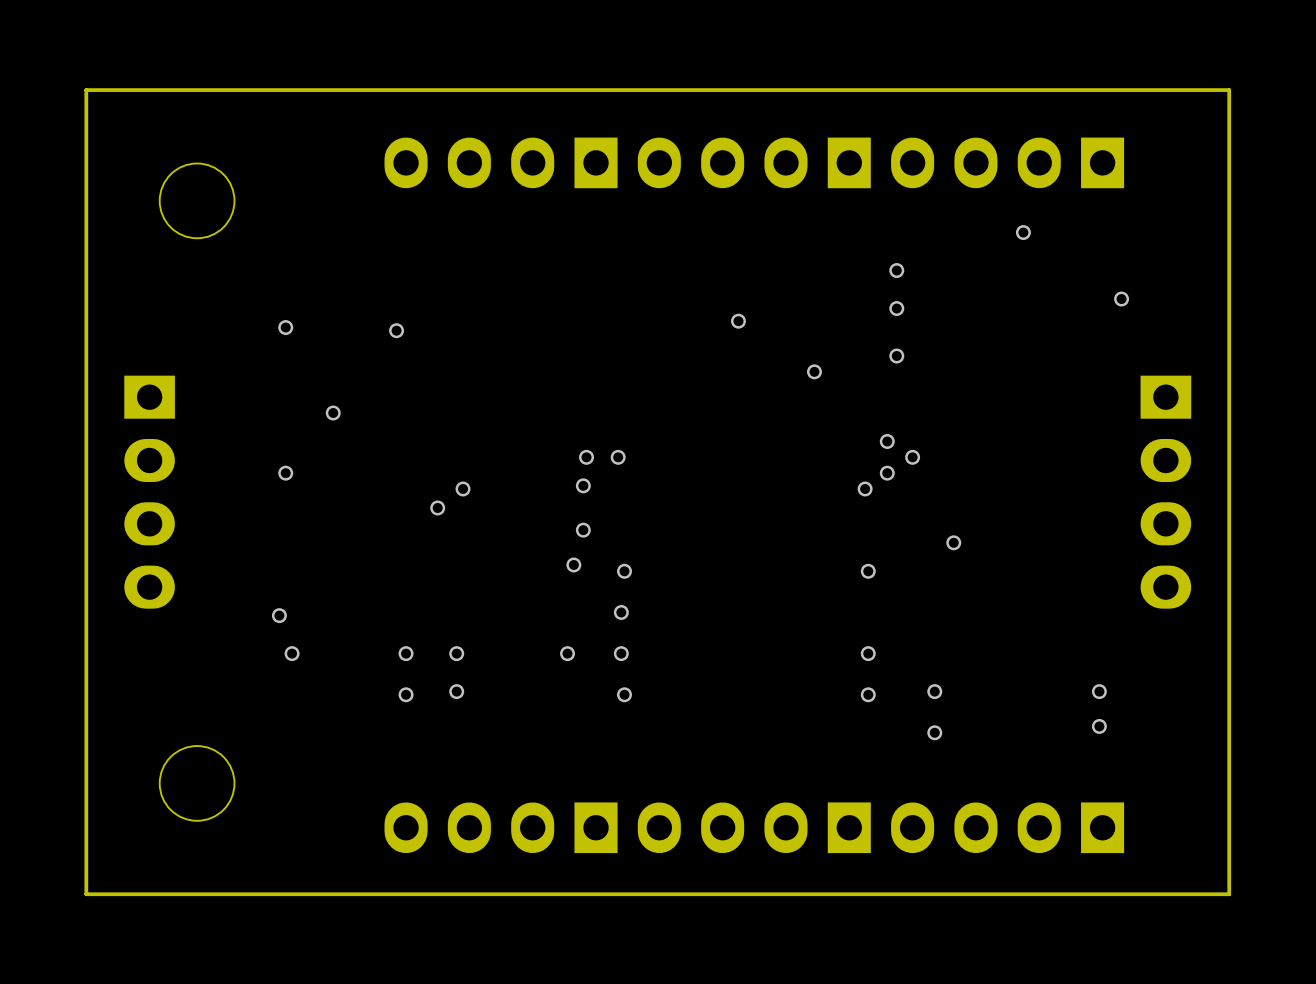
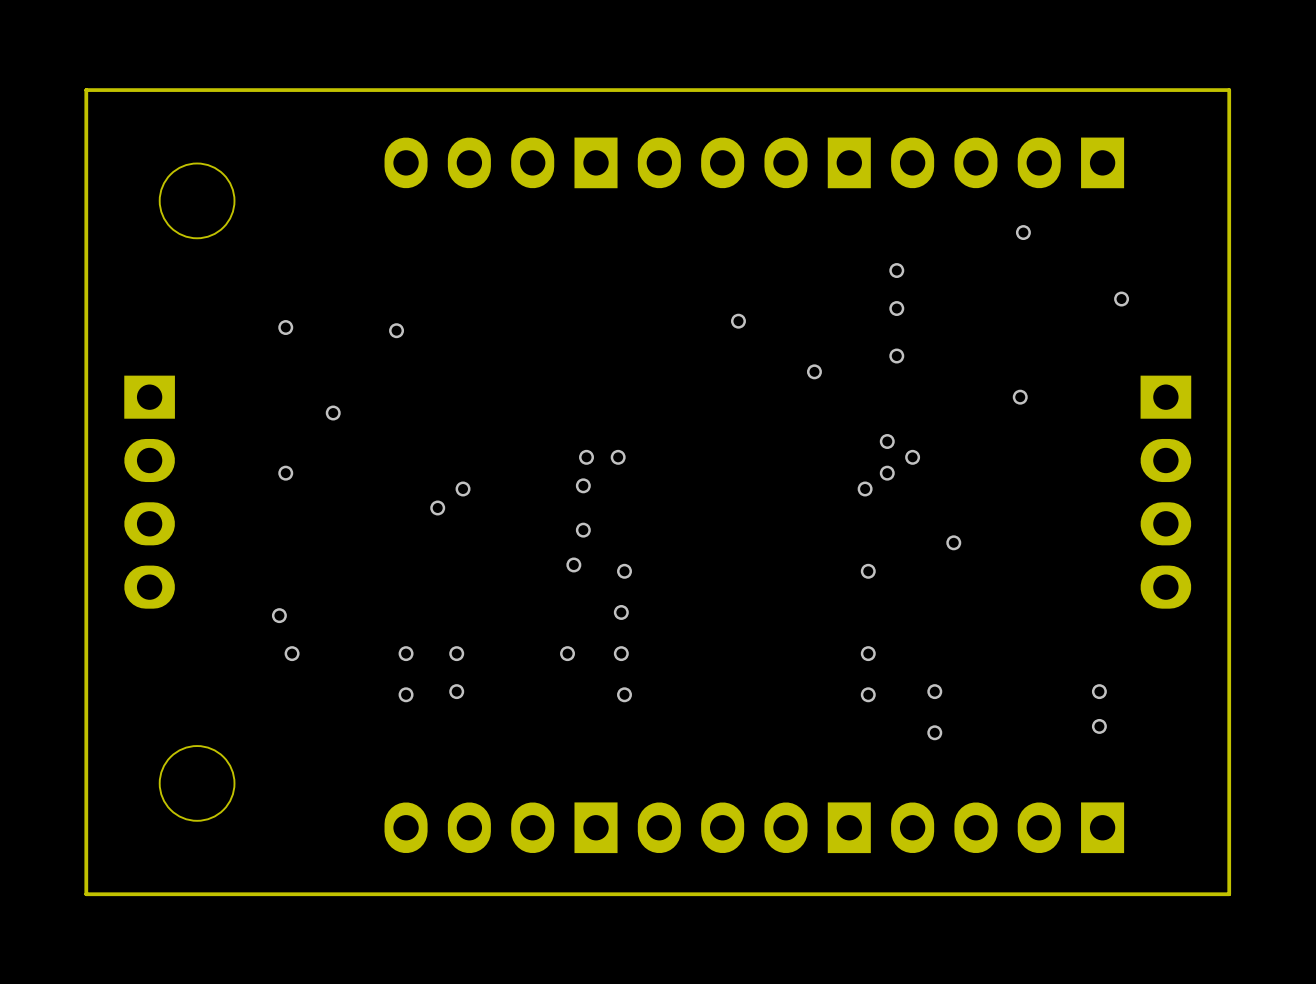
via: none -> (1020, 397)

